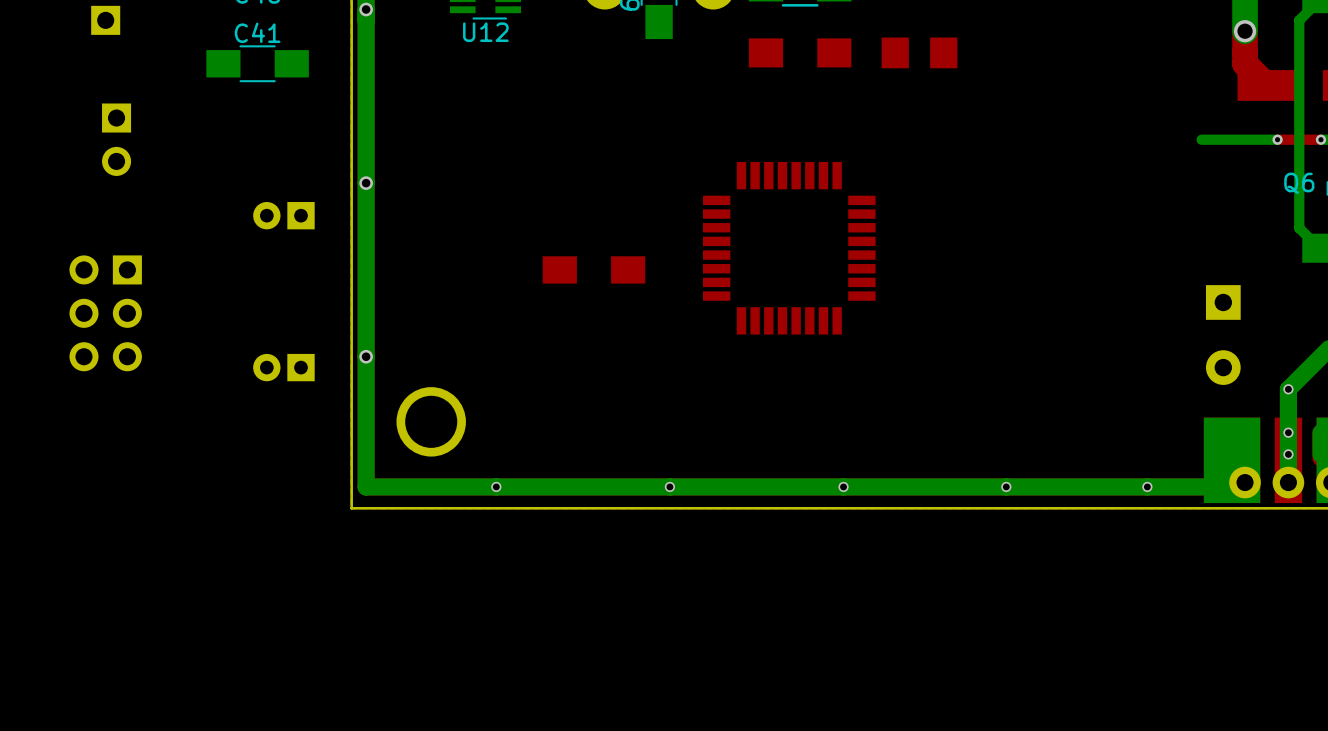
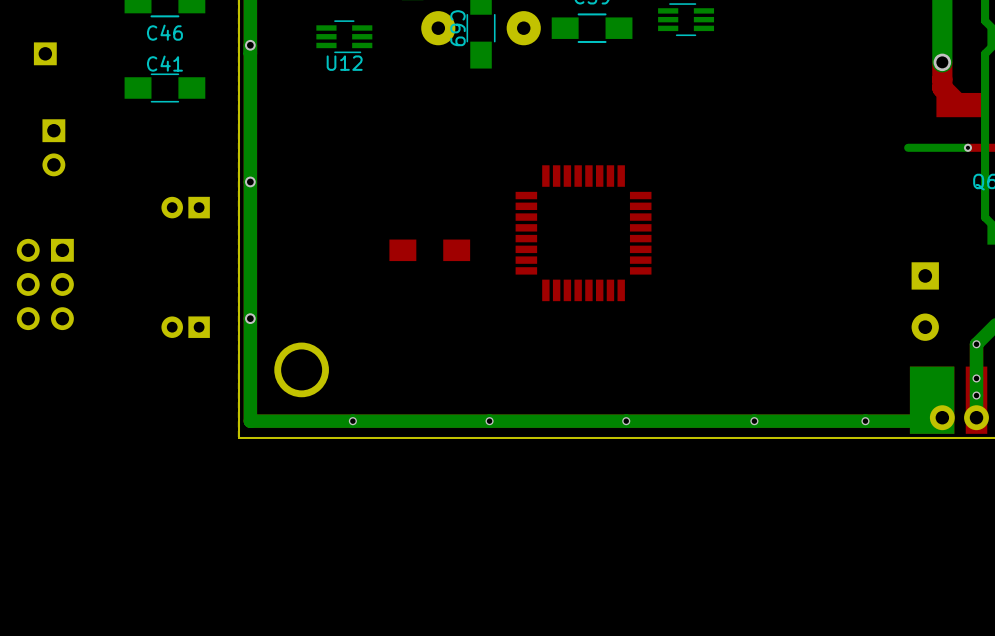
part: (800, 52) -> none
part: (919, 52) -> none

